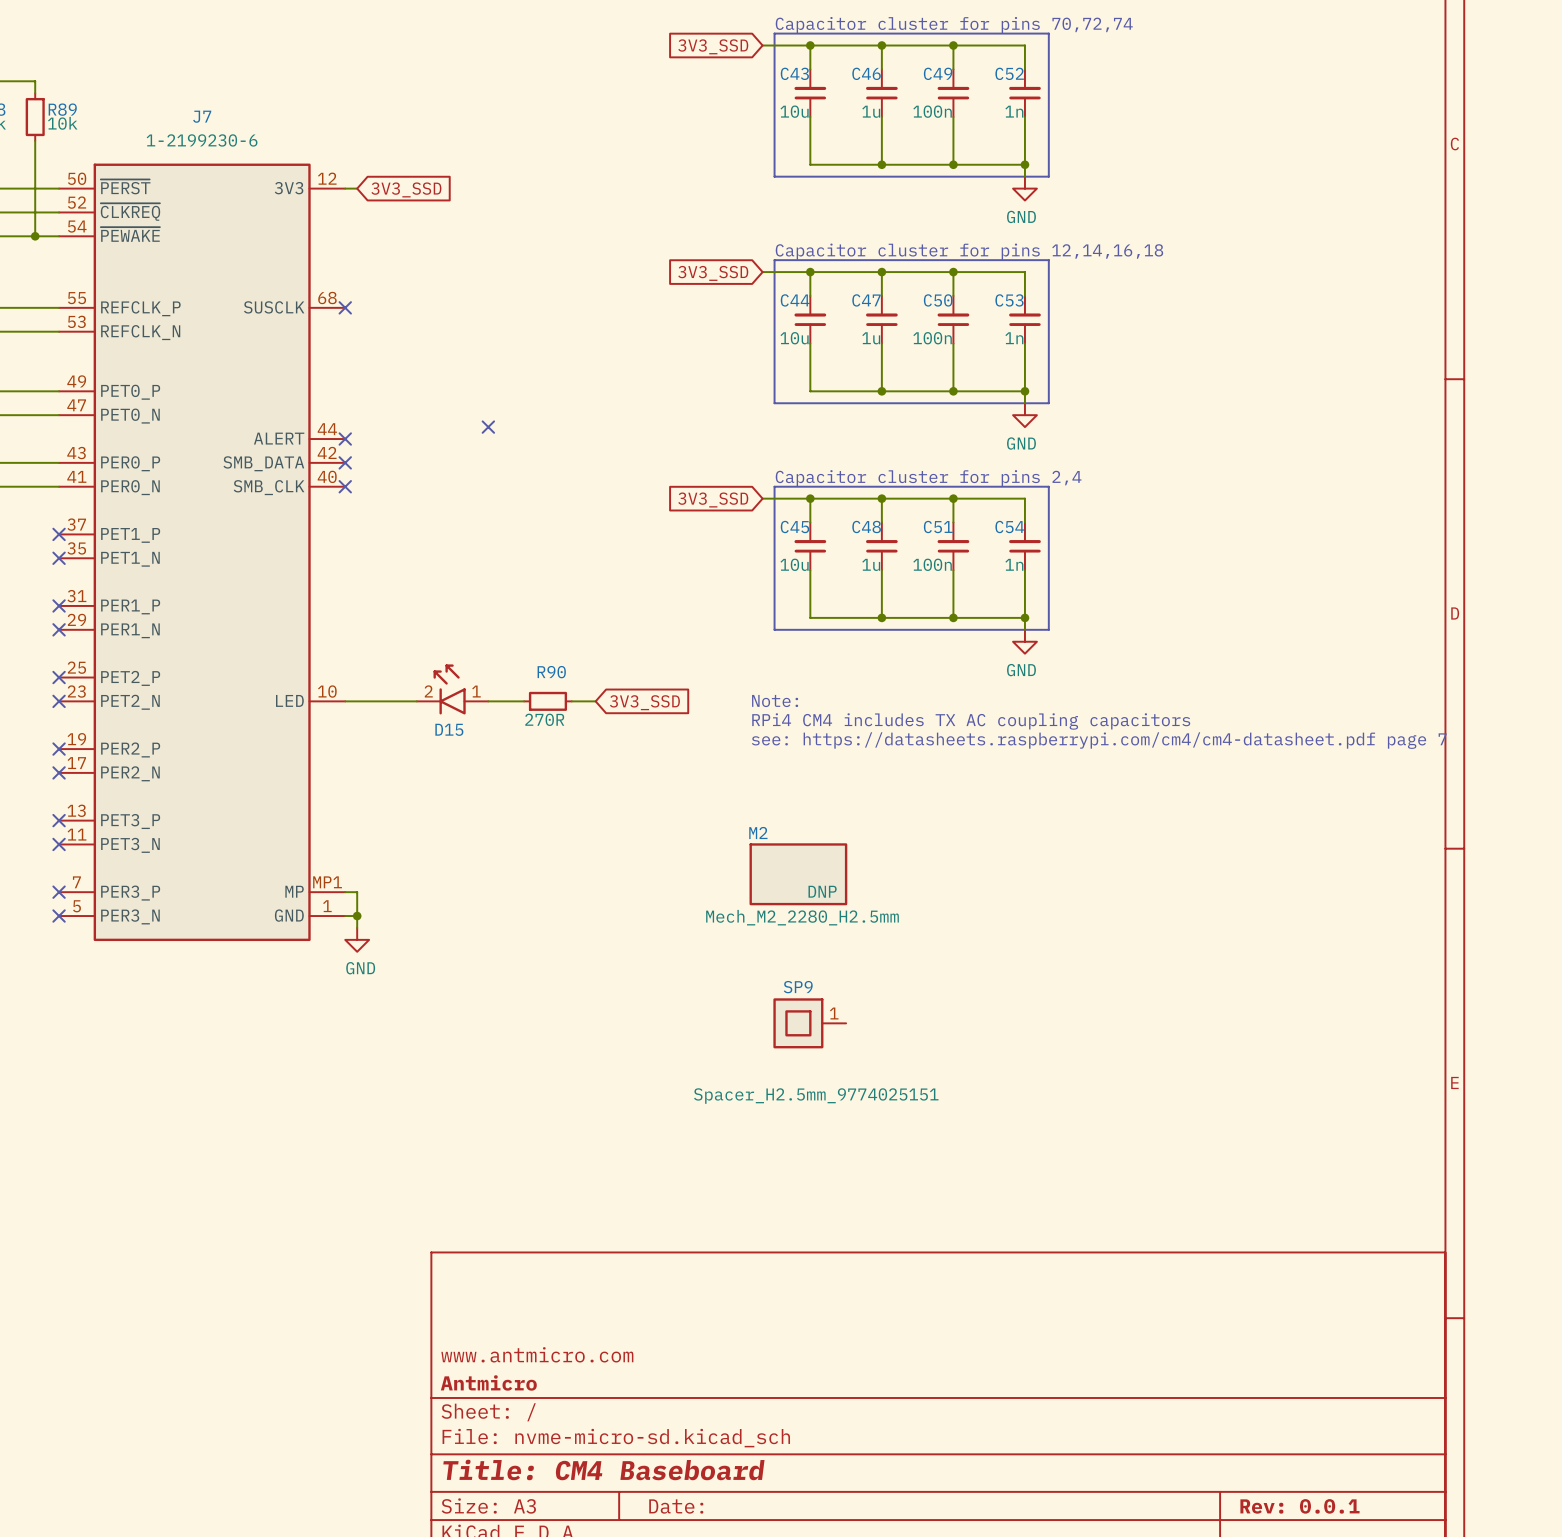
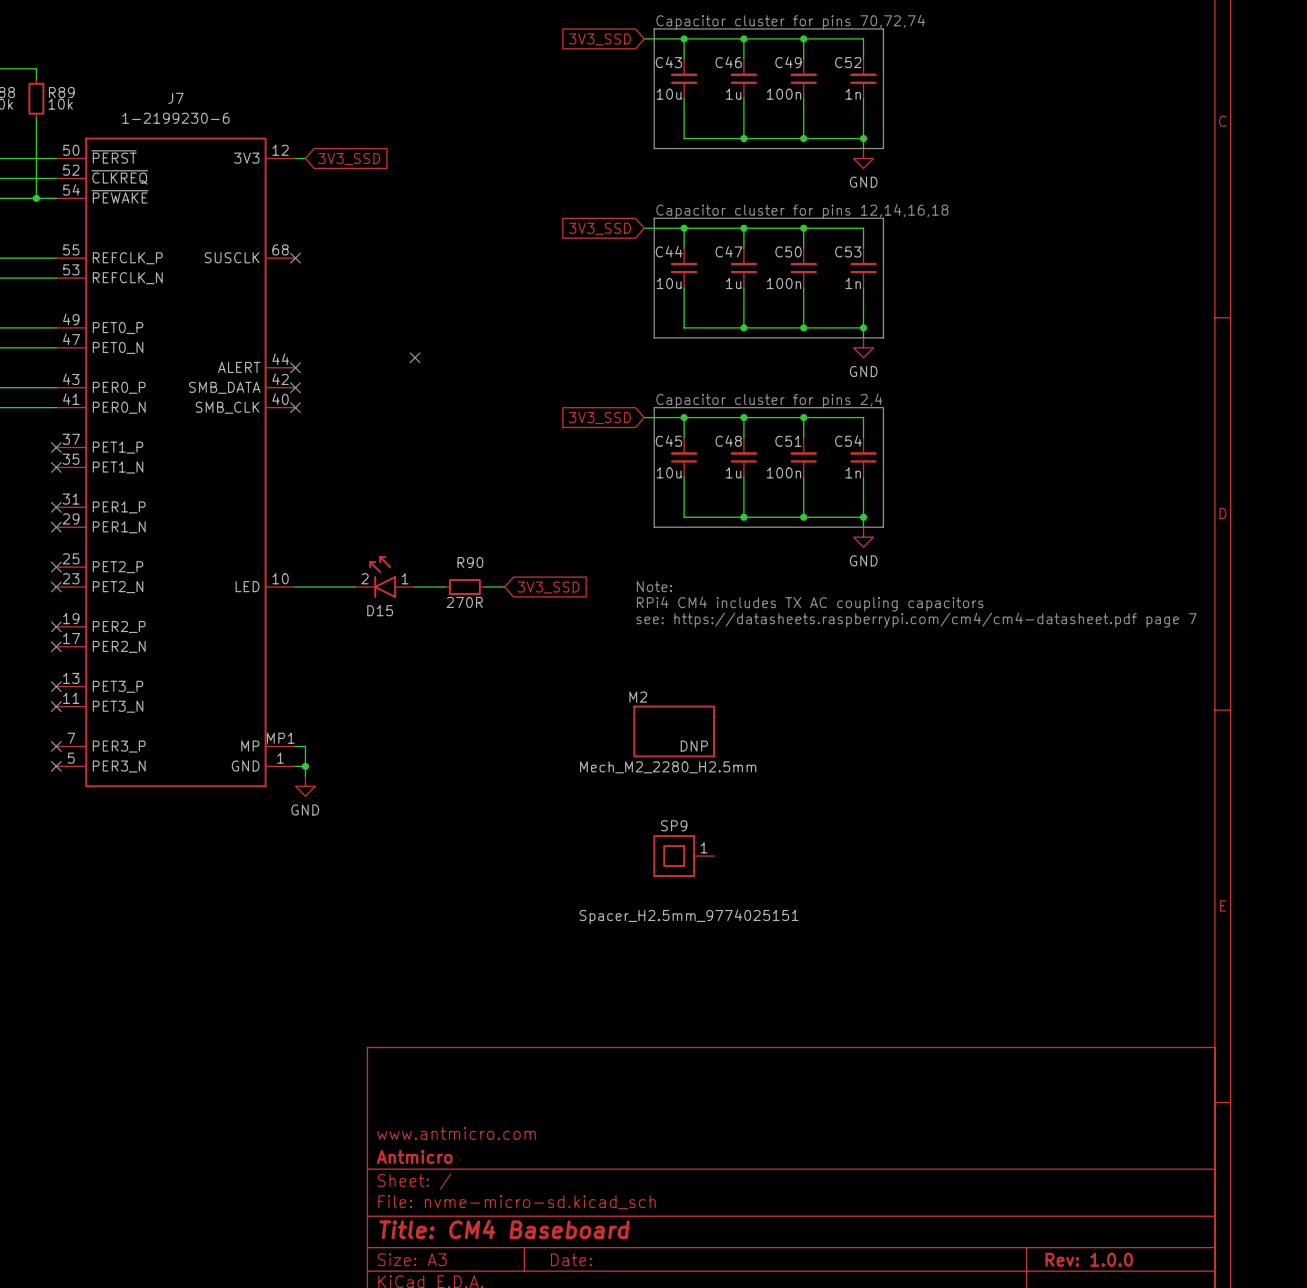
title block: Rev: 0.0.1 (1299, 1506) -> Rev: 1.0.0 (1089, 1259)

